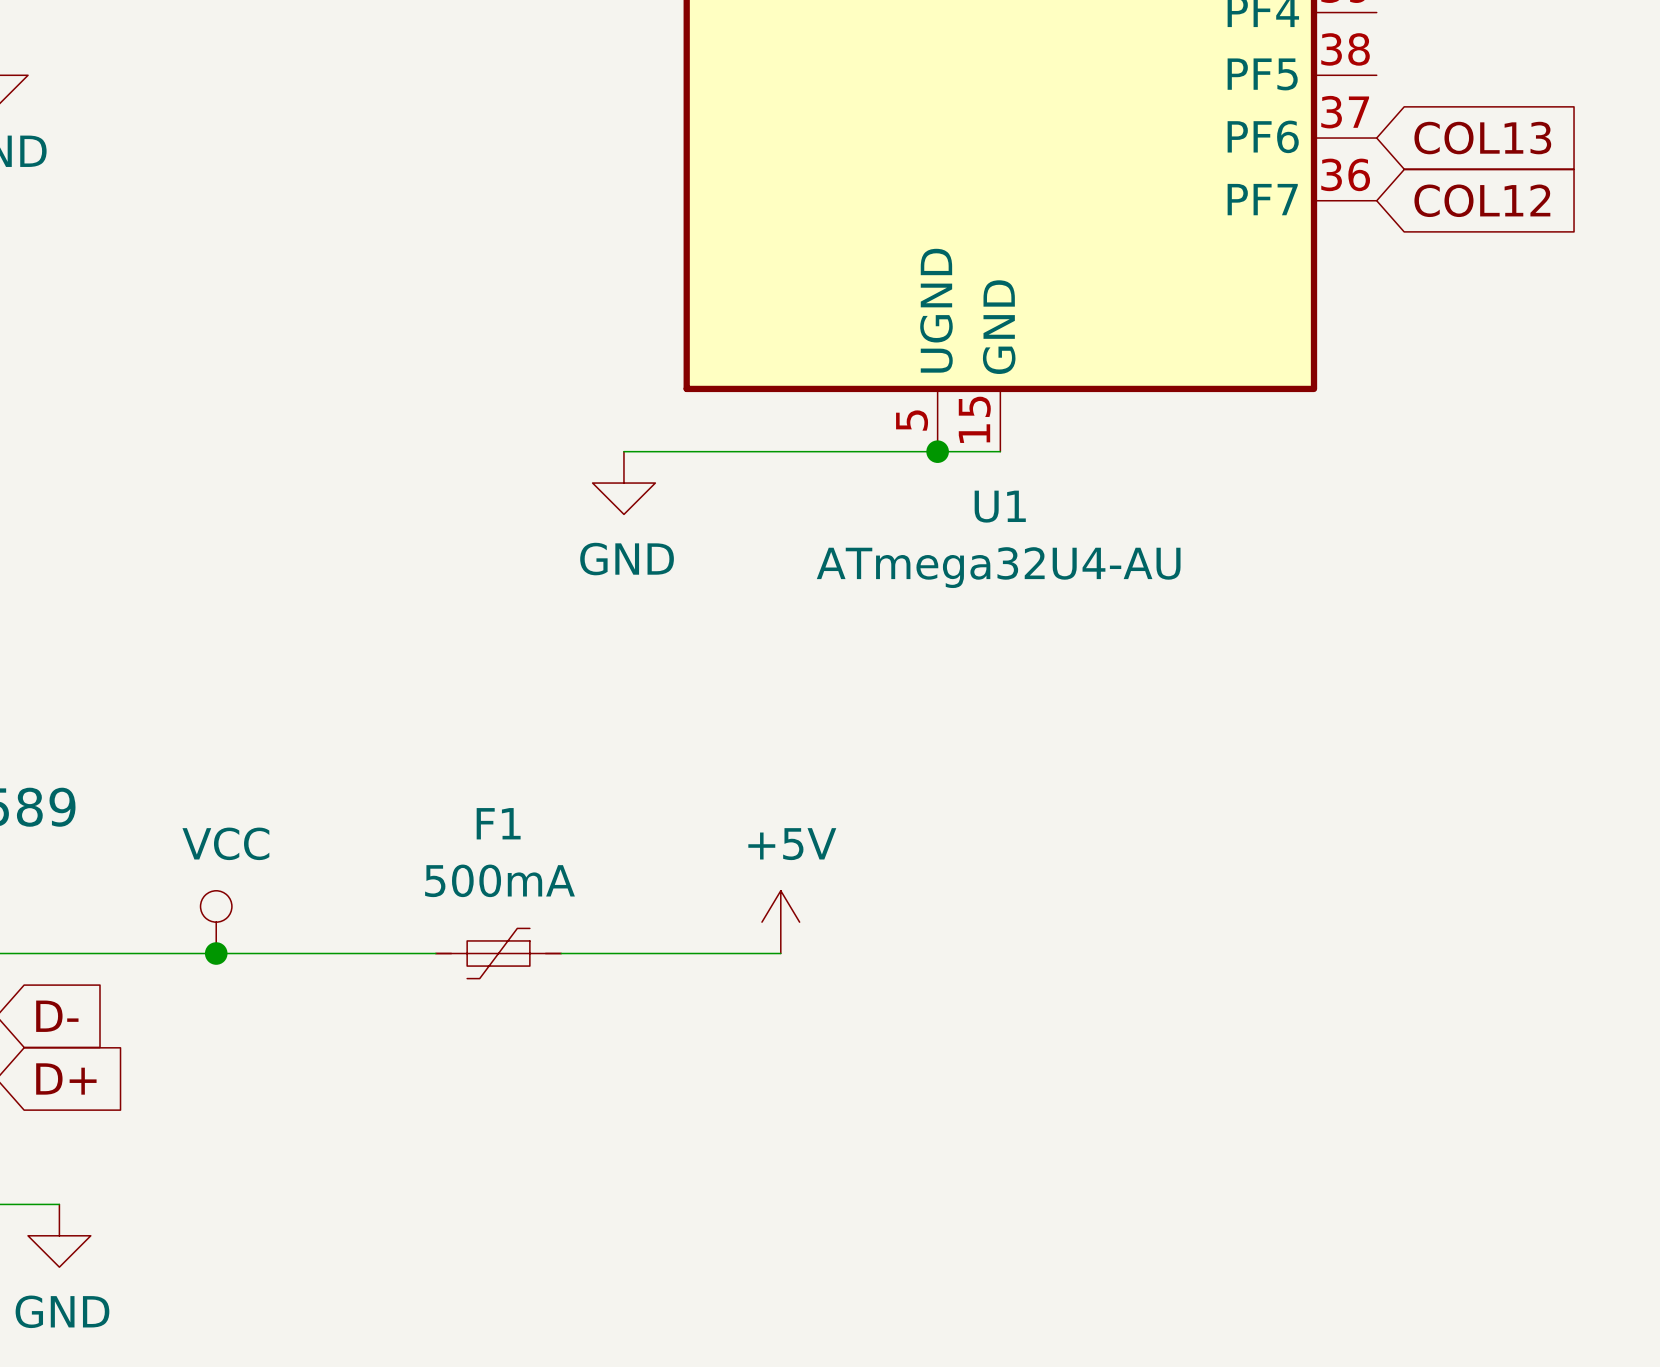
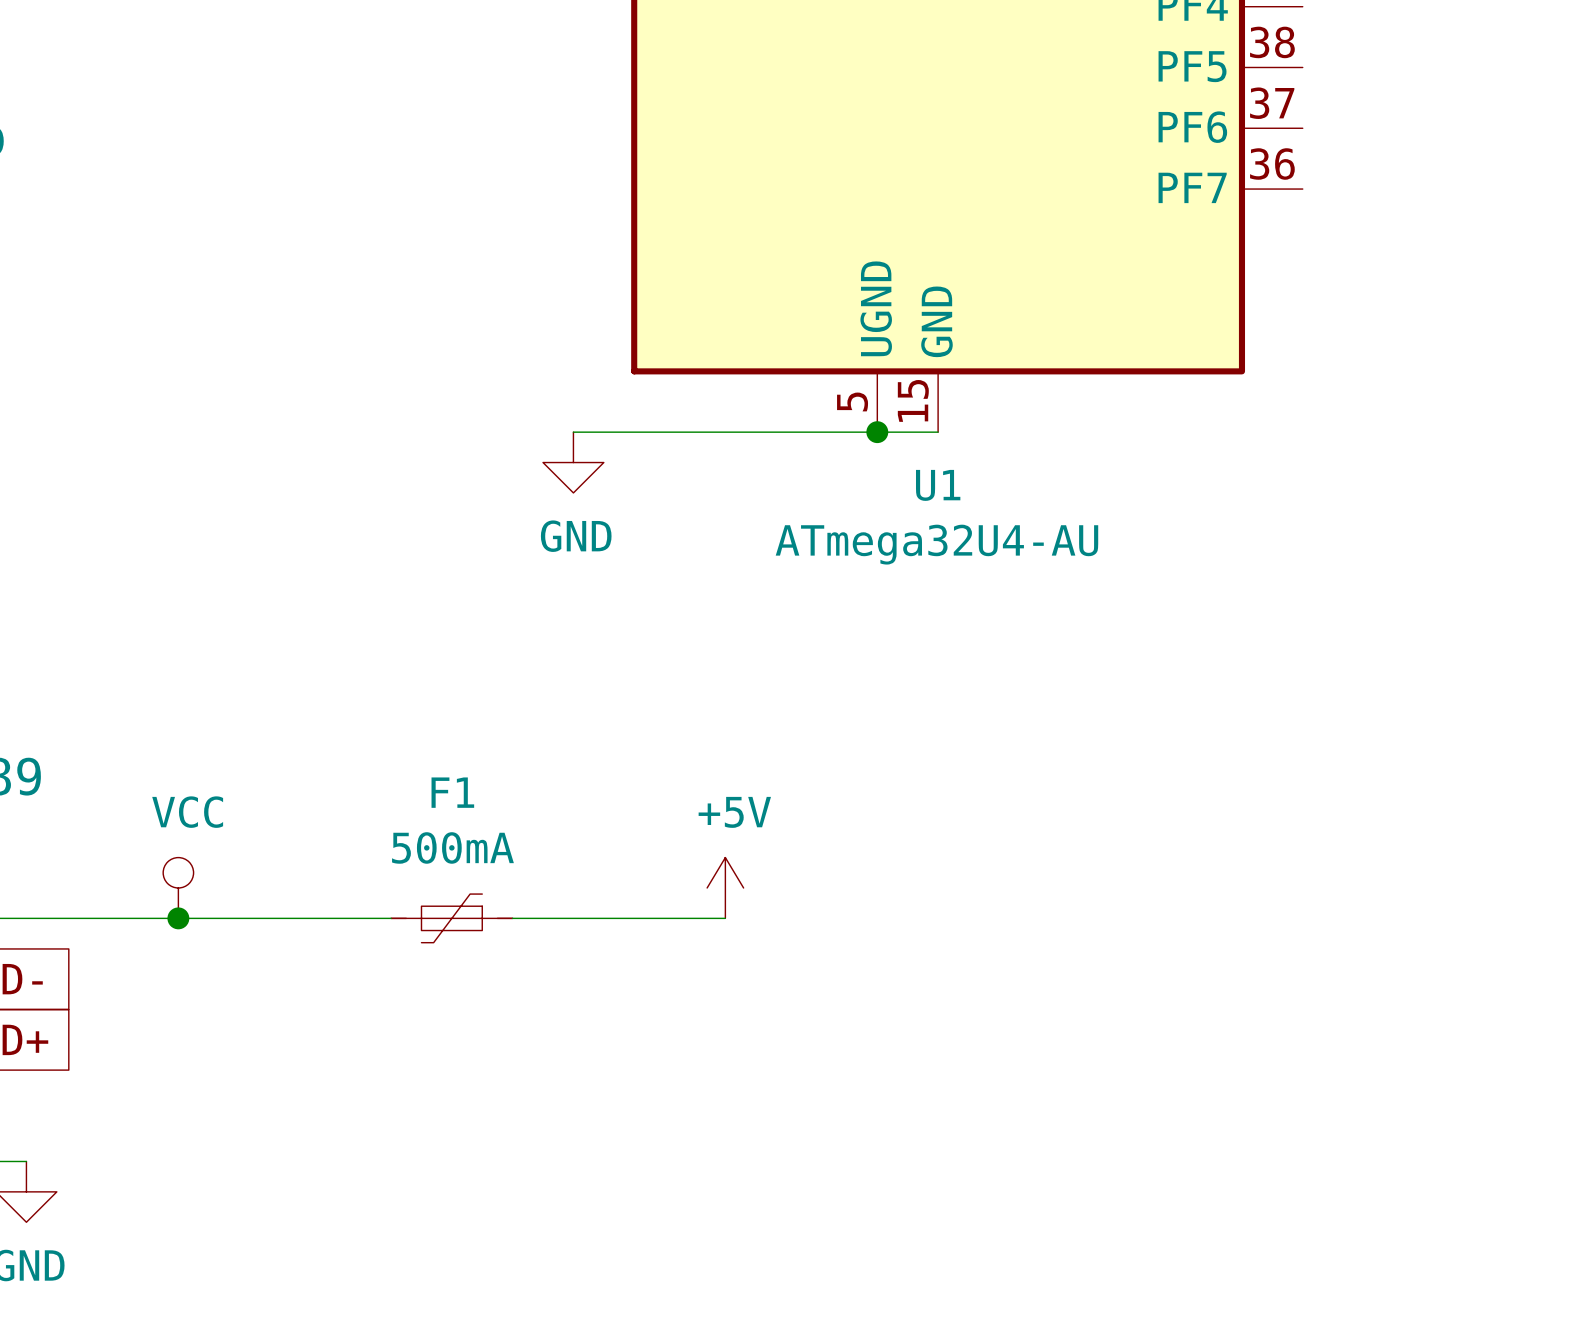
global label: COL13 (1482, 138) -> none
global label: COL12 (1482, 200) -> none

